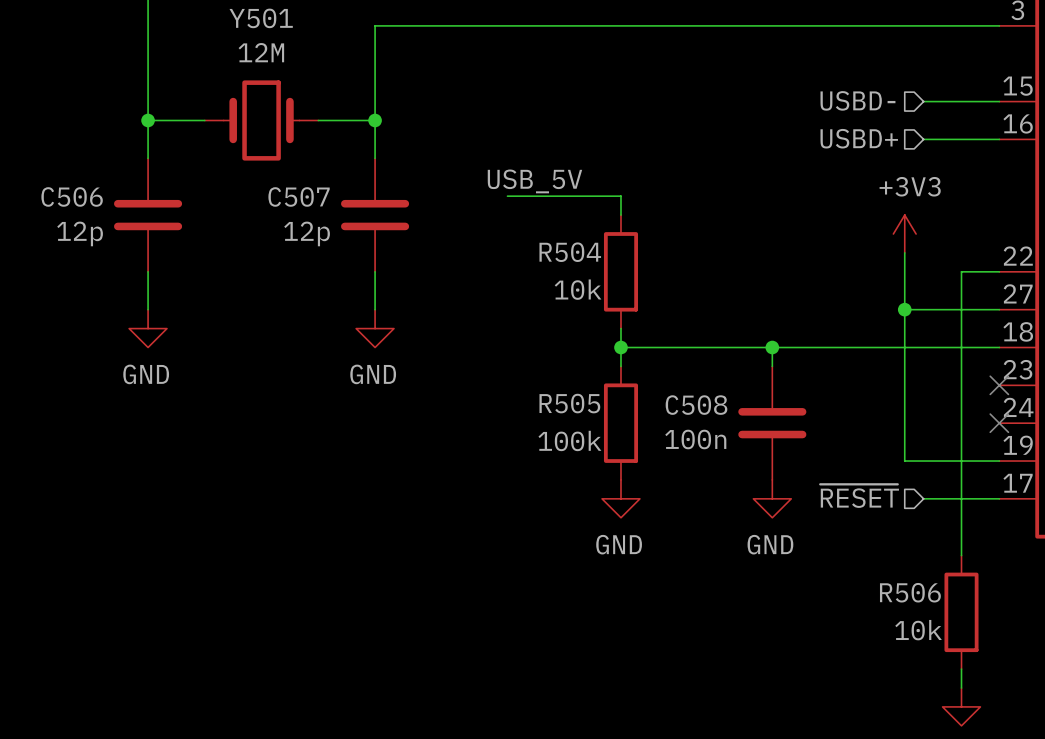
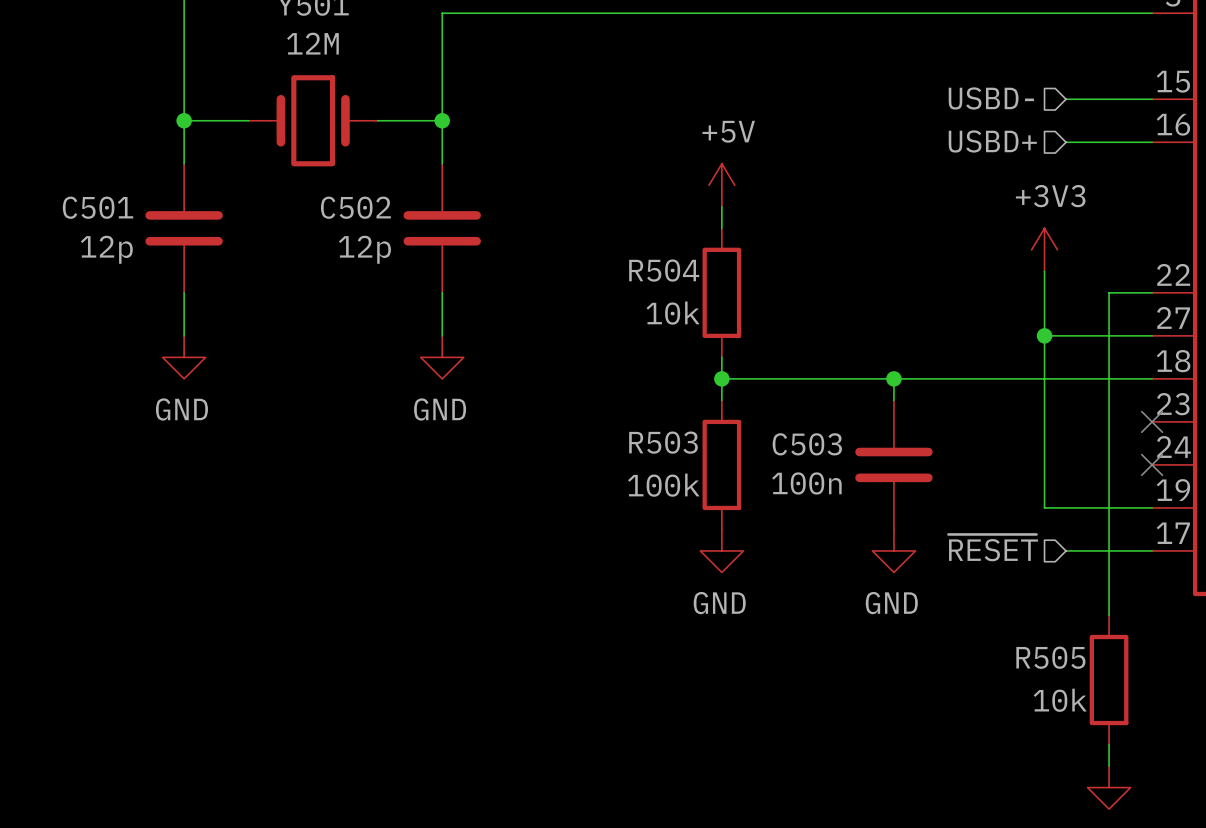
power symbol: none -> +5V (721, 185)
label: USB_5V (534, 181) -> none
C506 name: C506 (72, 196) -> C501 (98, 207)
C507 name: C507 (299, 196) -> C502 (355, 207)
wire: (507, 196) (620, 196) -> none
R505 name: R505 (569, 403) -> R503 (663, 442)
C508 name: C508 (696, 405) -> C503 (807, 444)
R506 name: R506 (910, 592) -> R505 (1050, 657)

